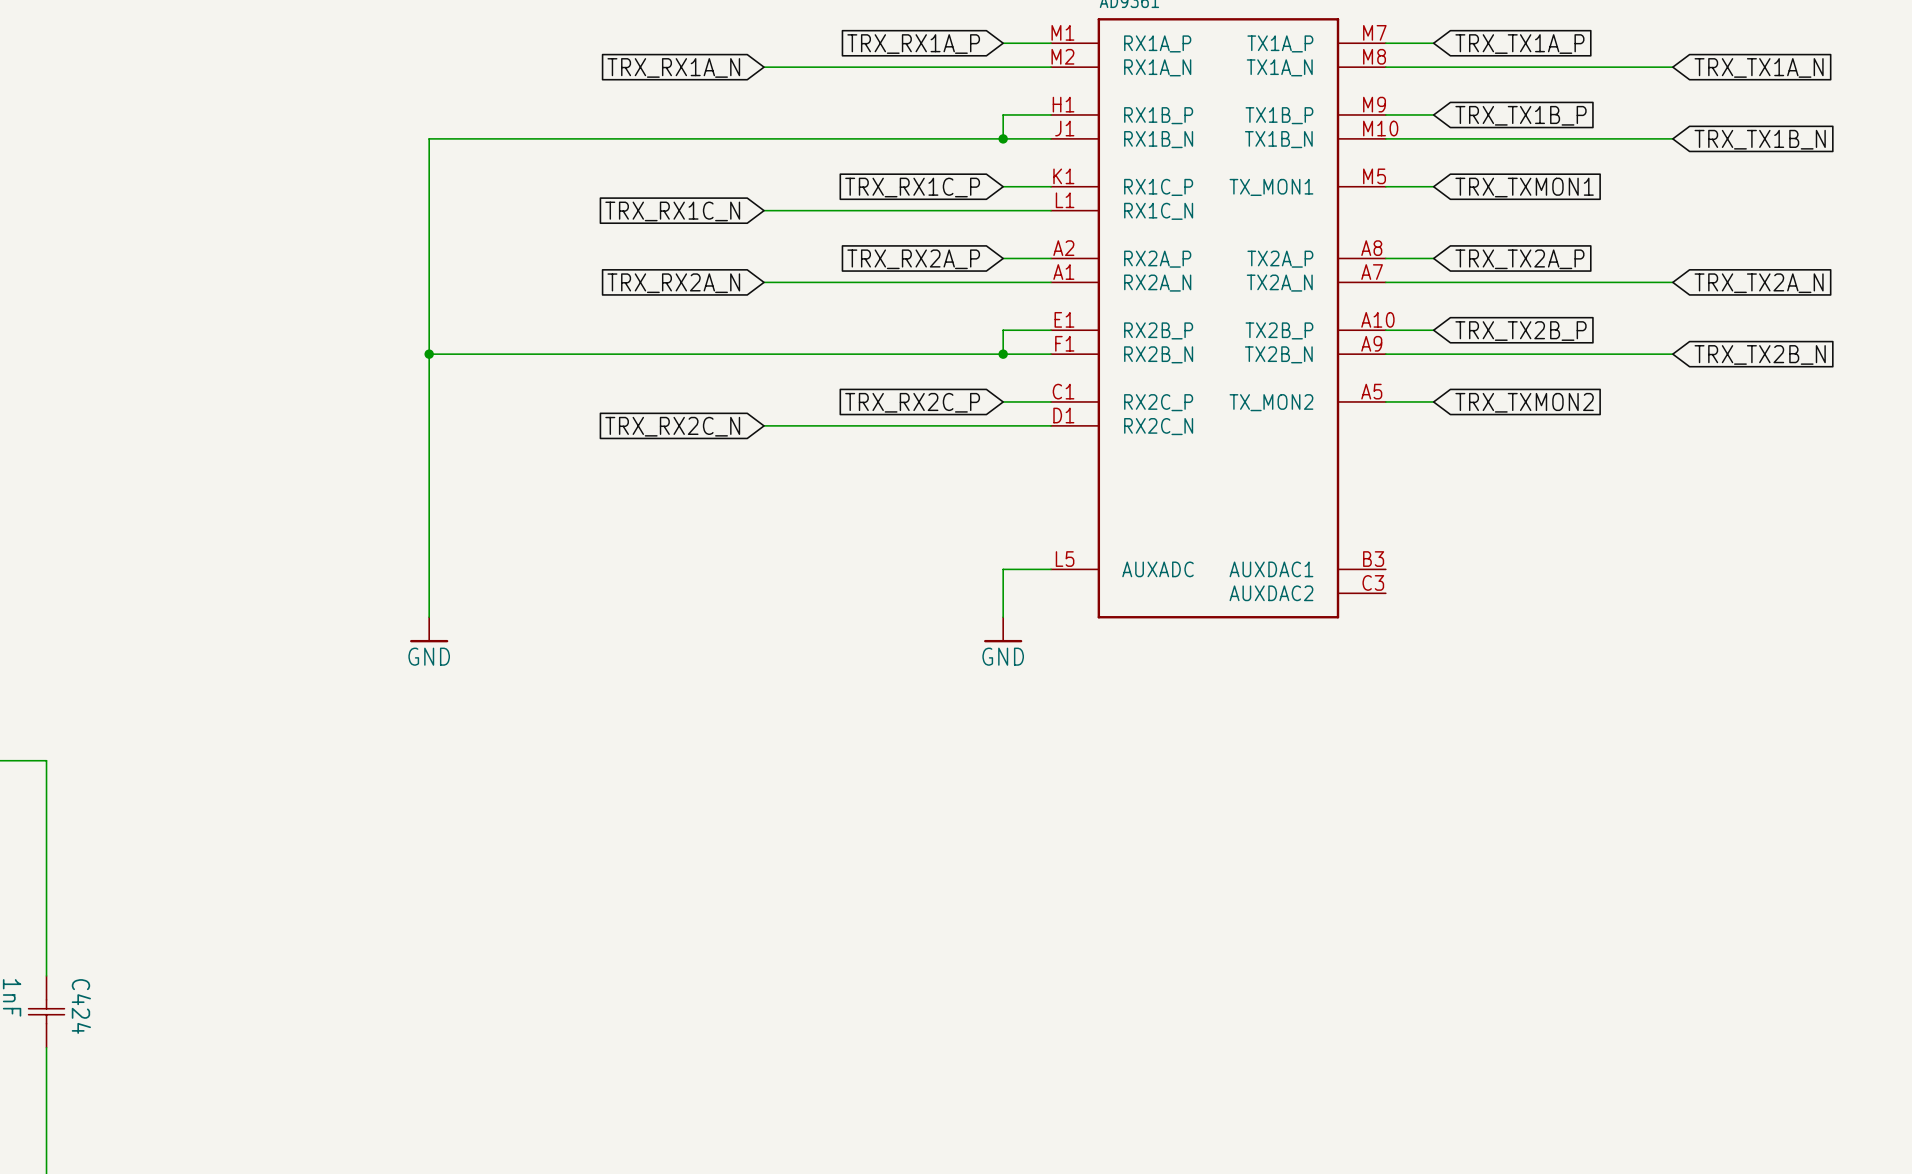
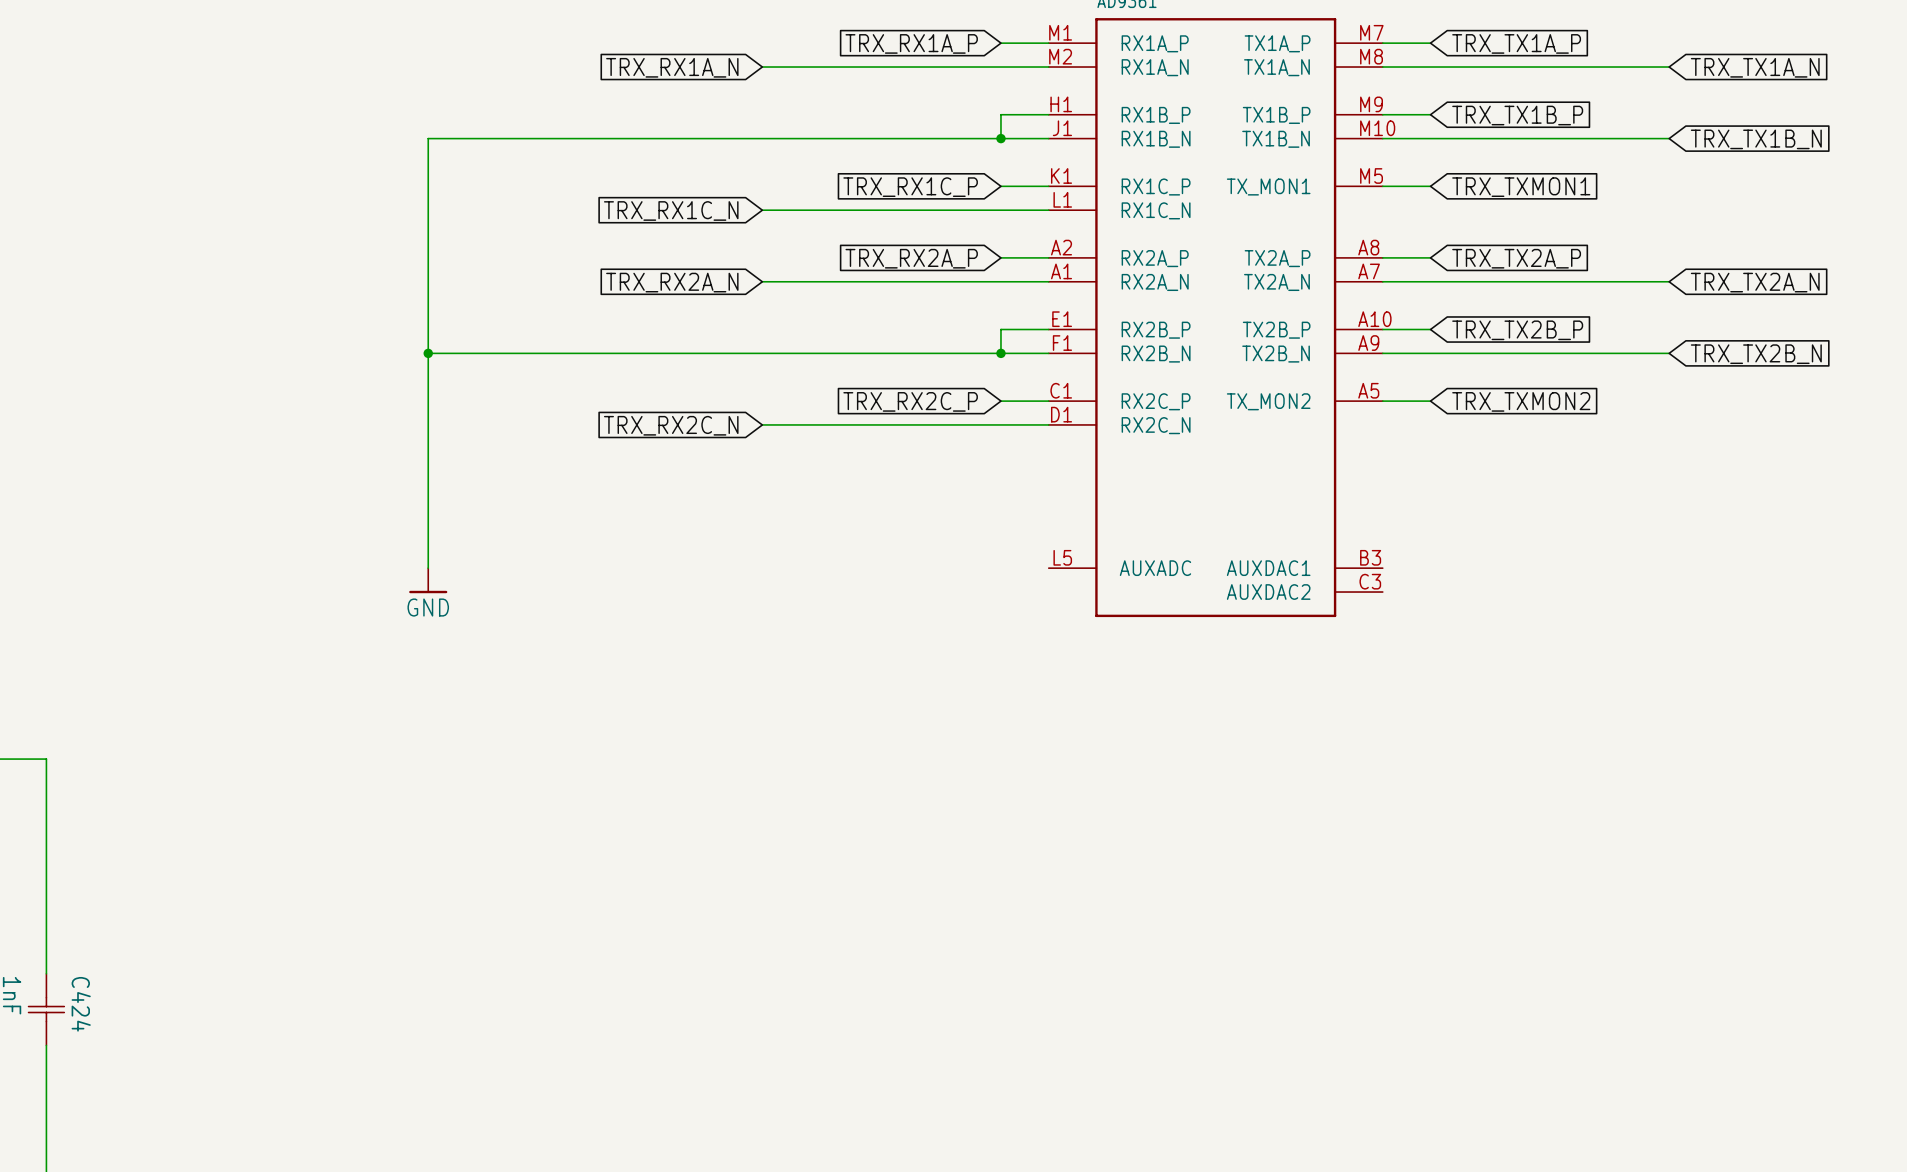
wire: (1051, 569) (1003, 569) (1003, 617) -> none
power symbol position: GND (429, 629) -> GND (428, 580)
power symbol: GND (1003, 629) -> none

